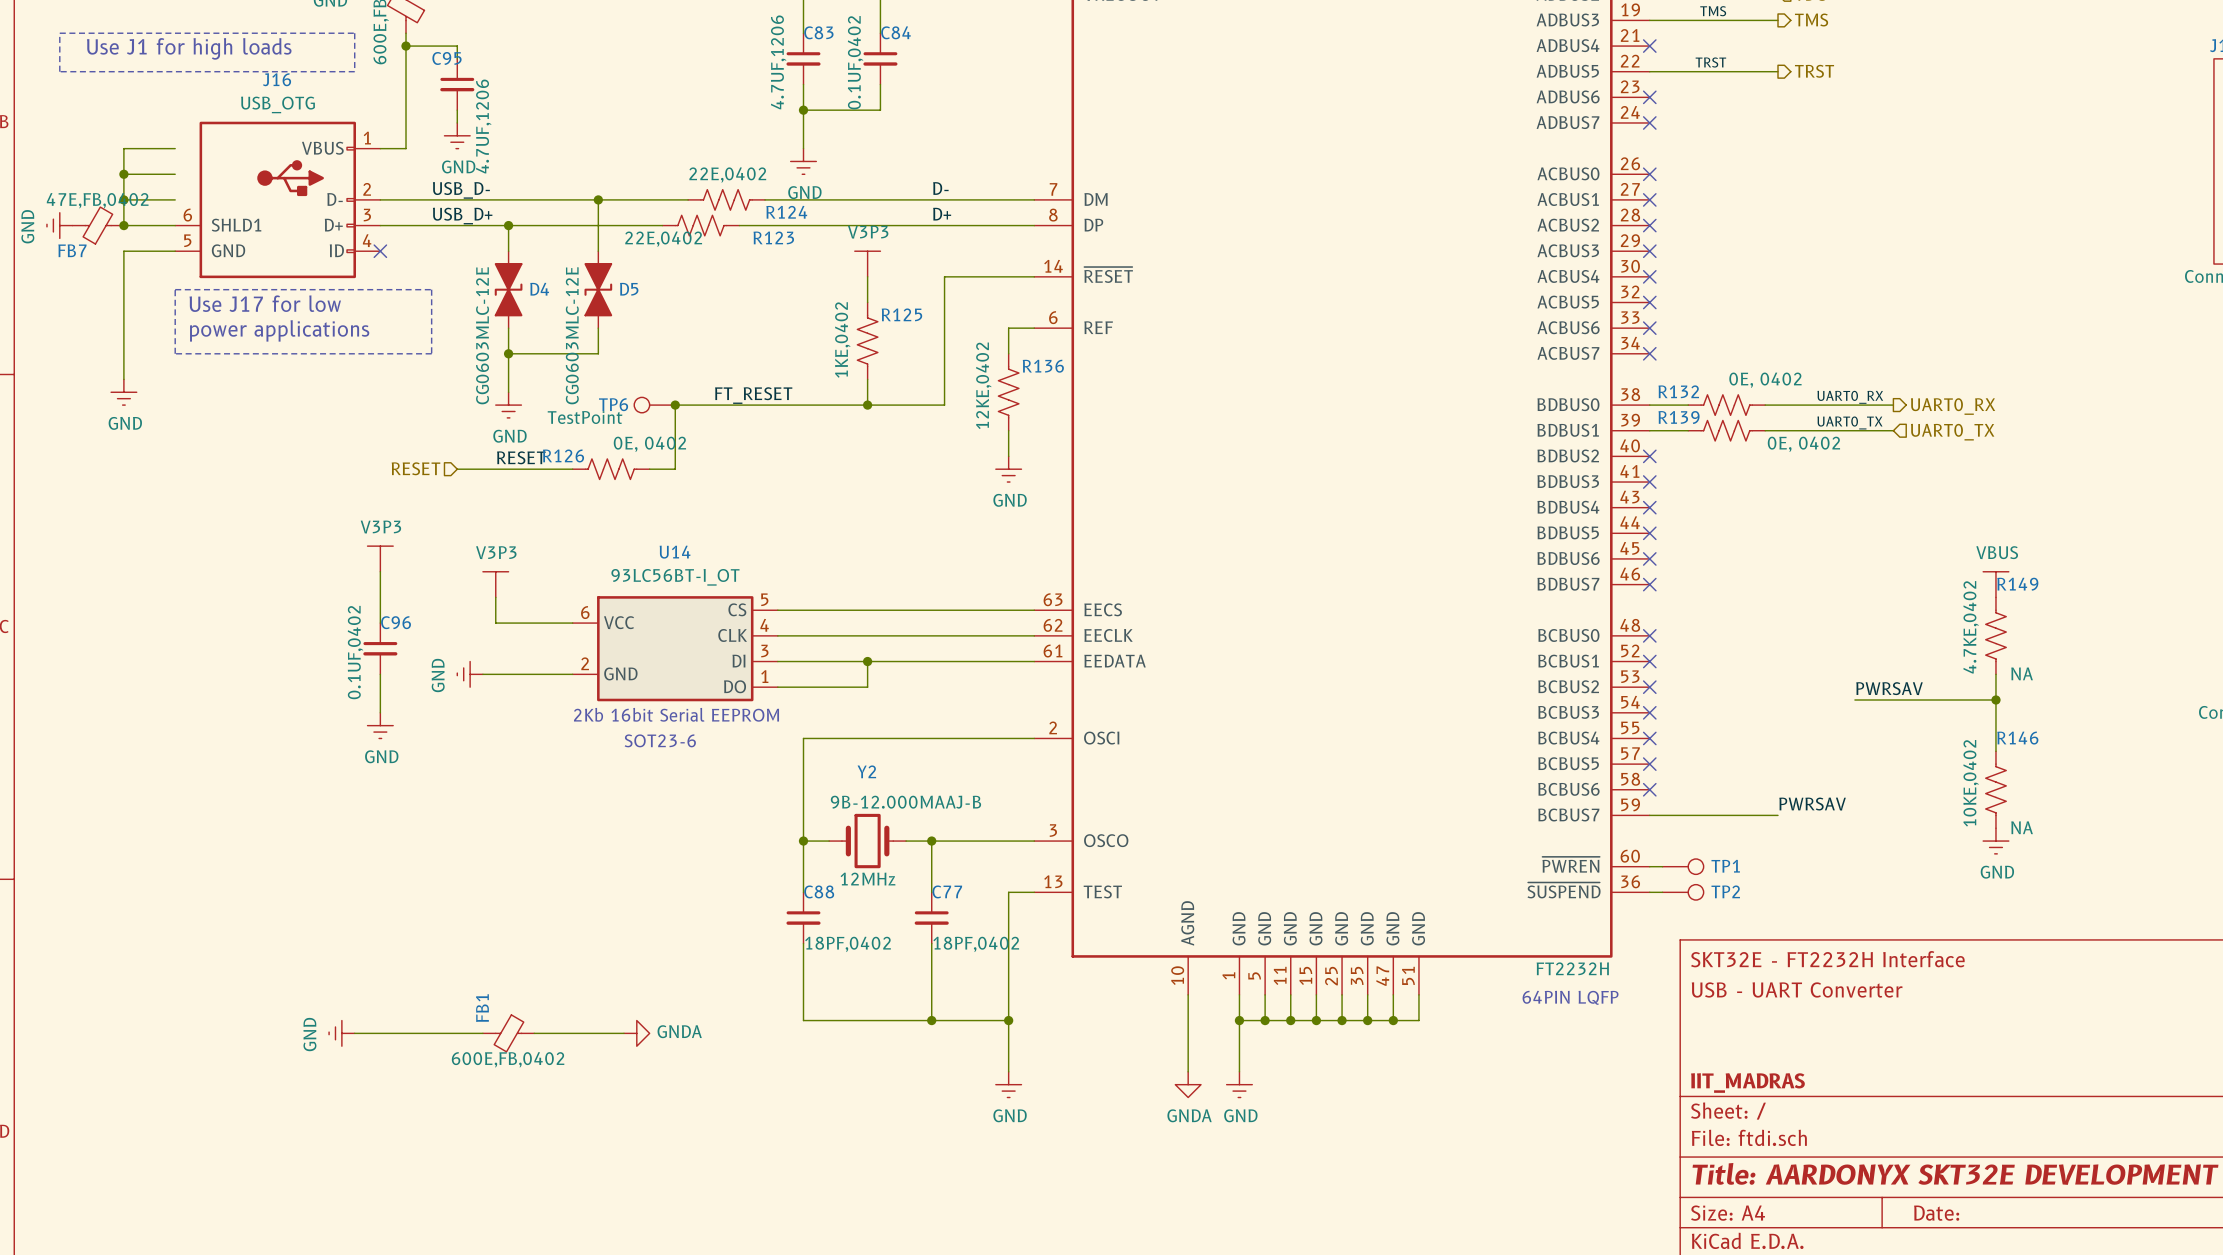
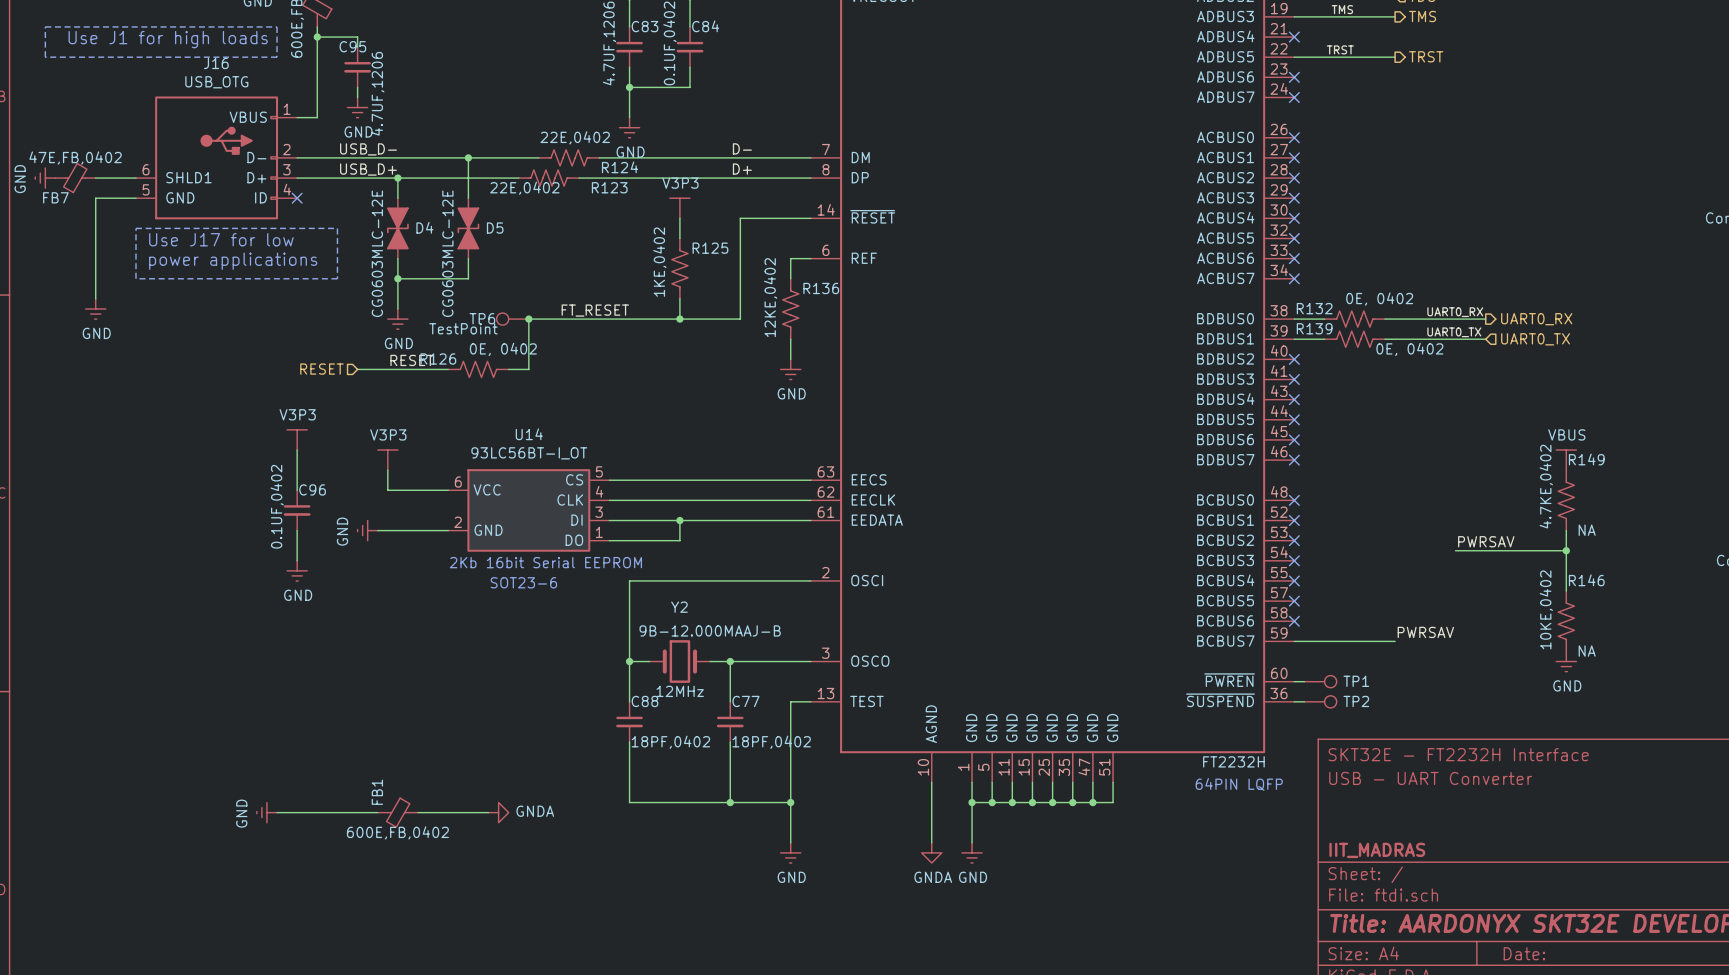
wire: (175, 148) (123, 148) (123, 225) -> none
wire: (123, 174) (175, 174) -> none
junction: (123, 174) -> none
wire: (123, 199) (175, 199) -> none
junction: (123, 199) -> none
junction: (123, 225) -> none

